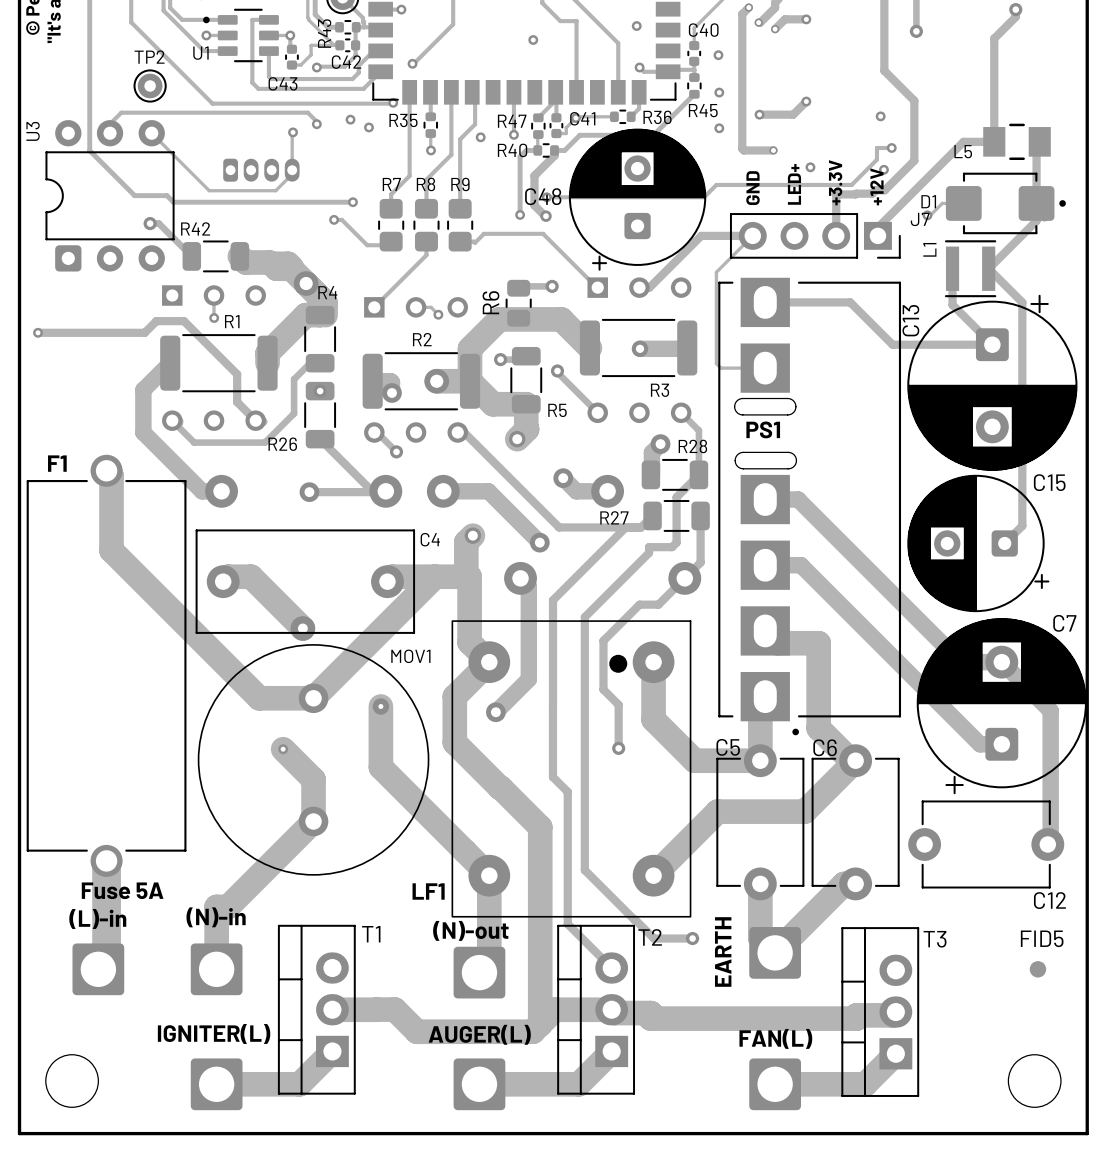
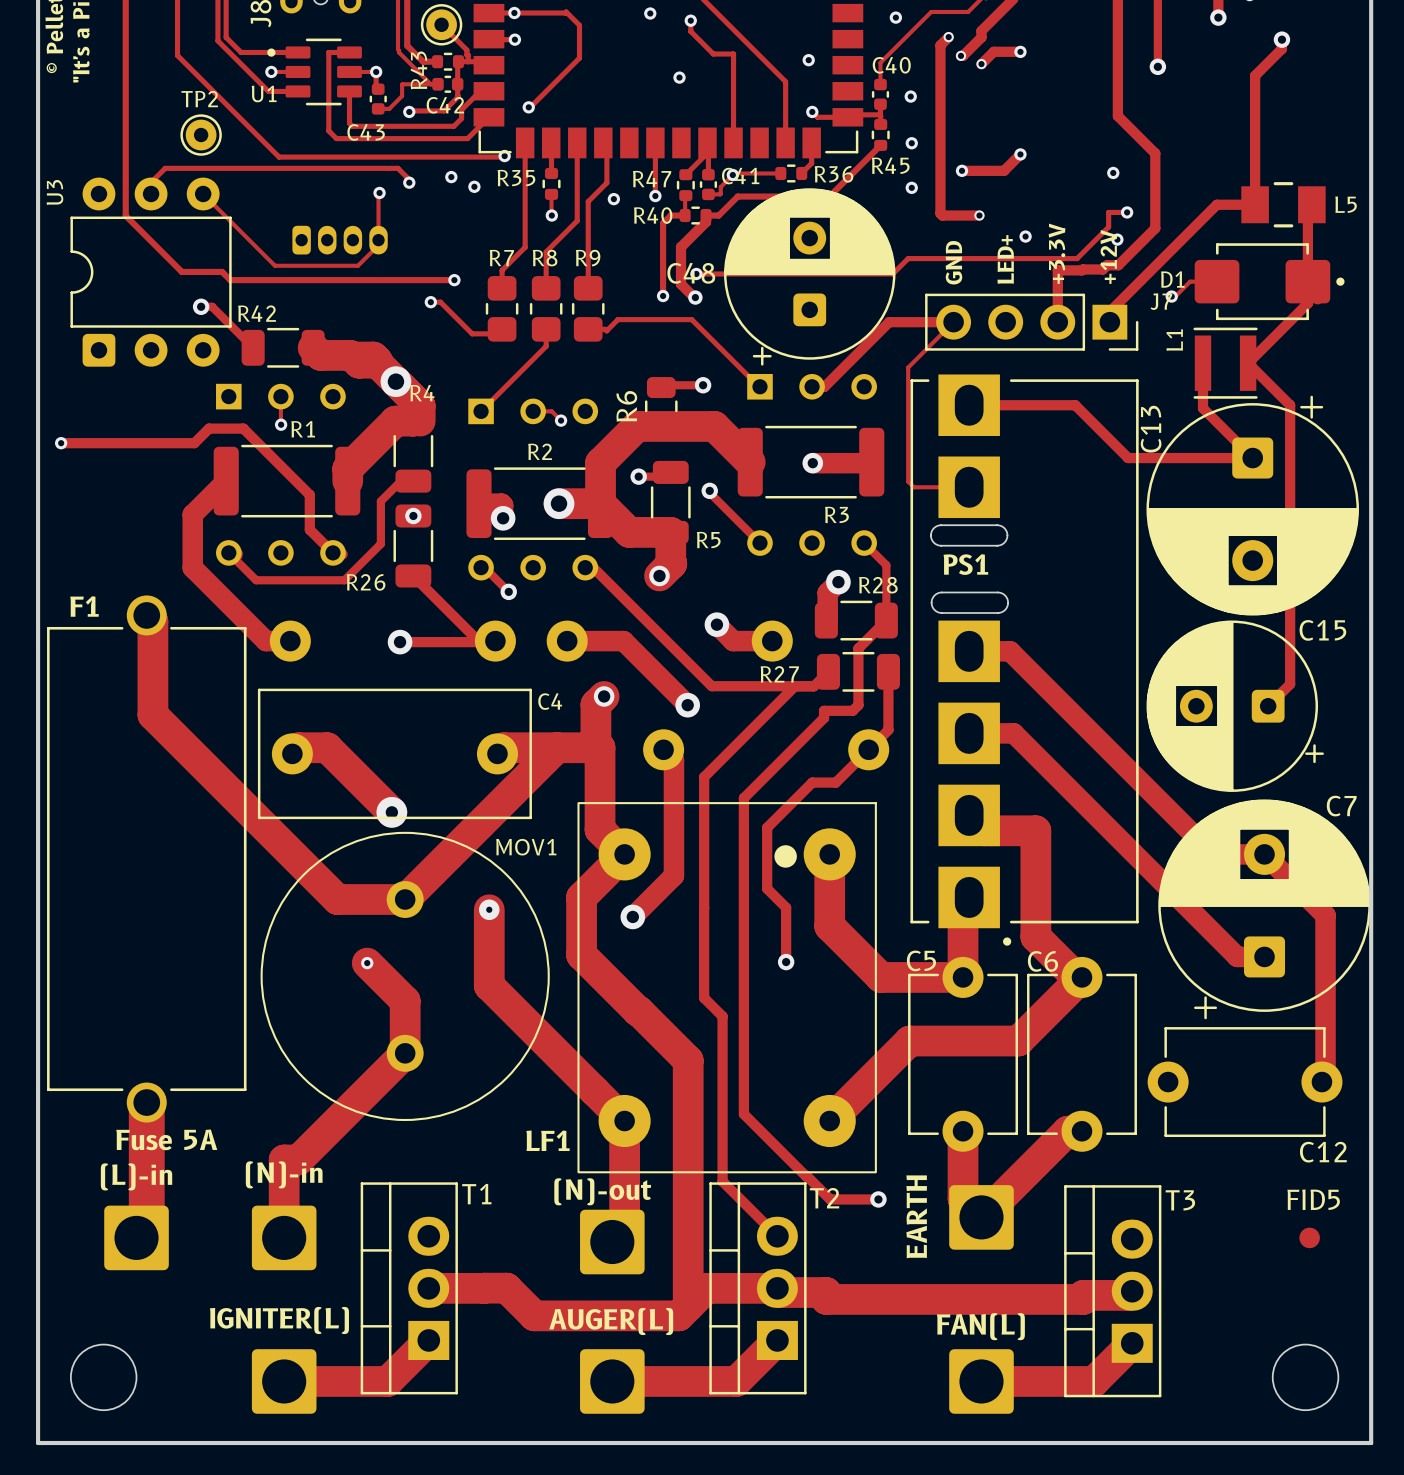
L5 name position: L5 (963, 151) -> L5 (1346, 204)

